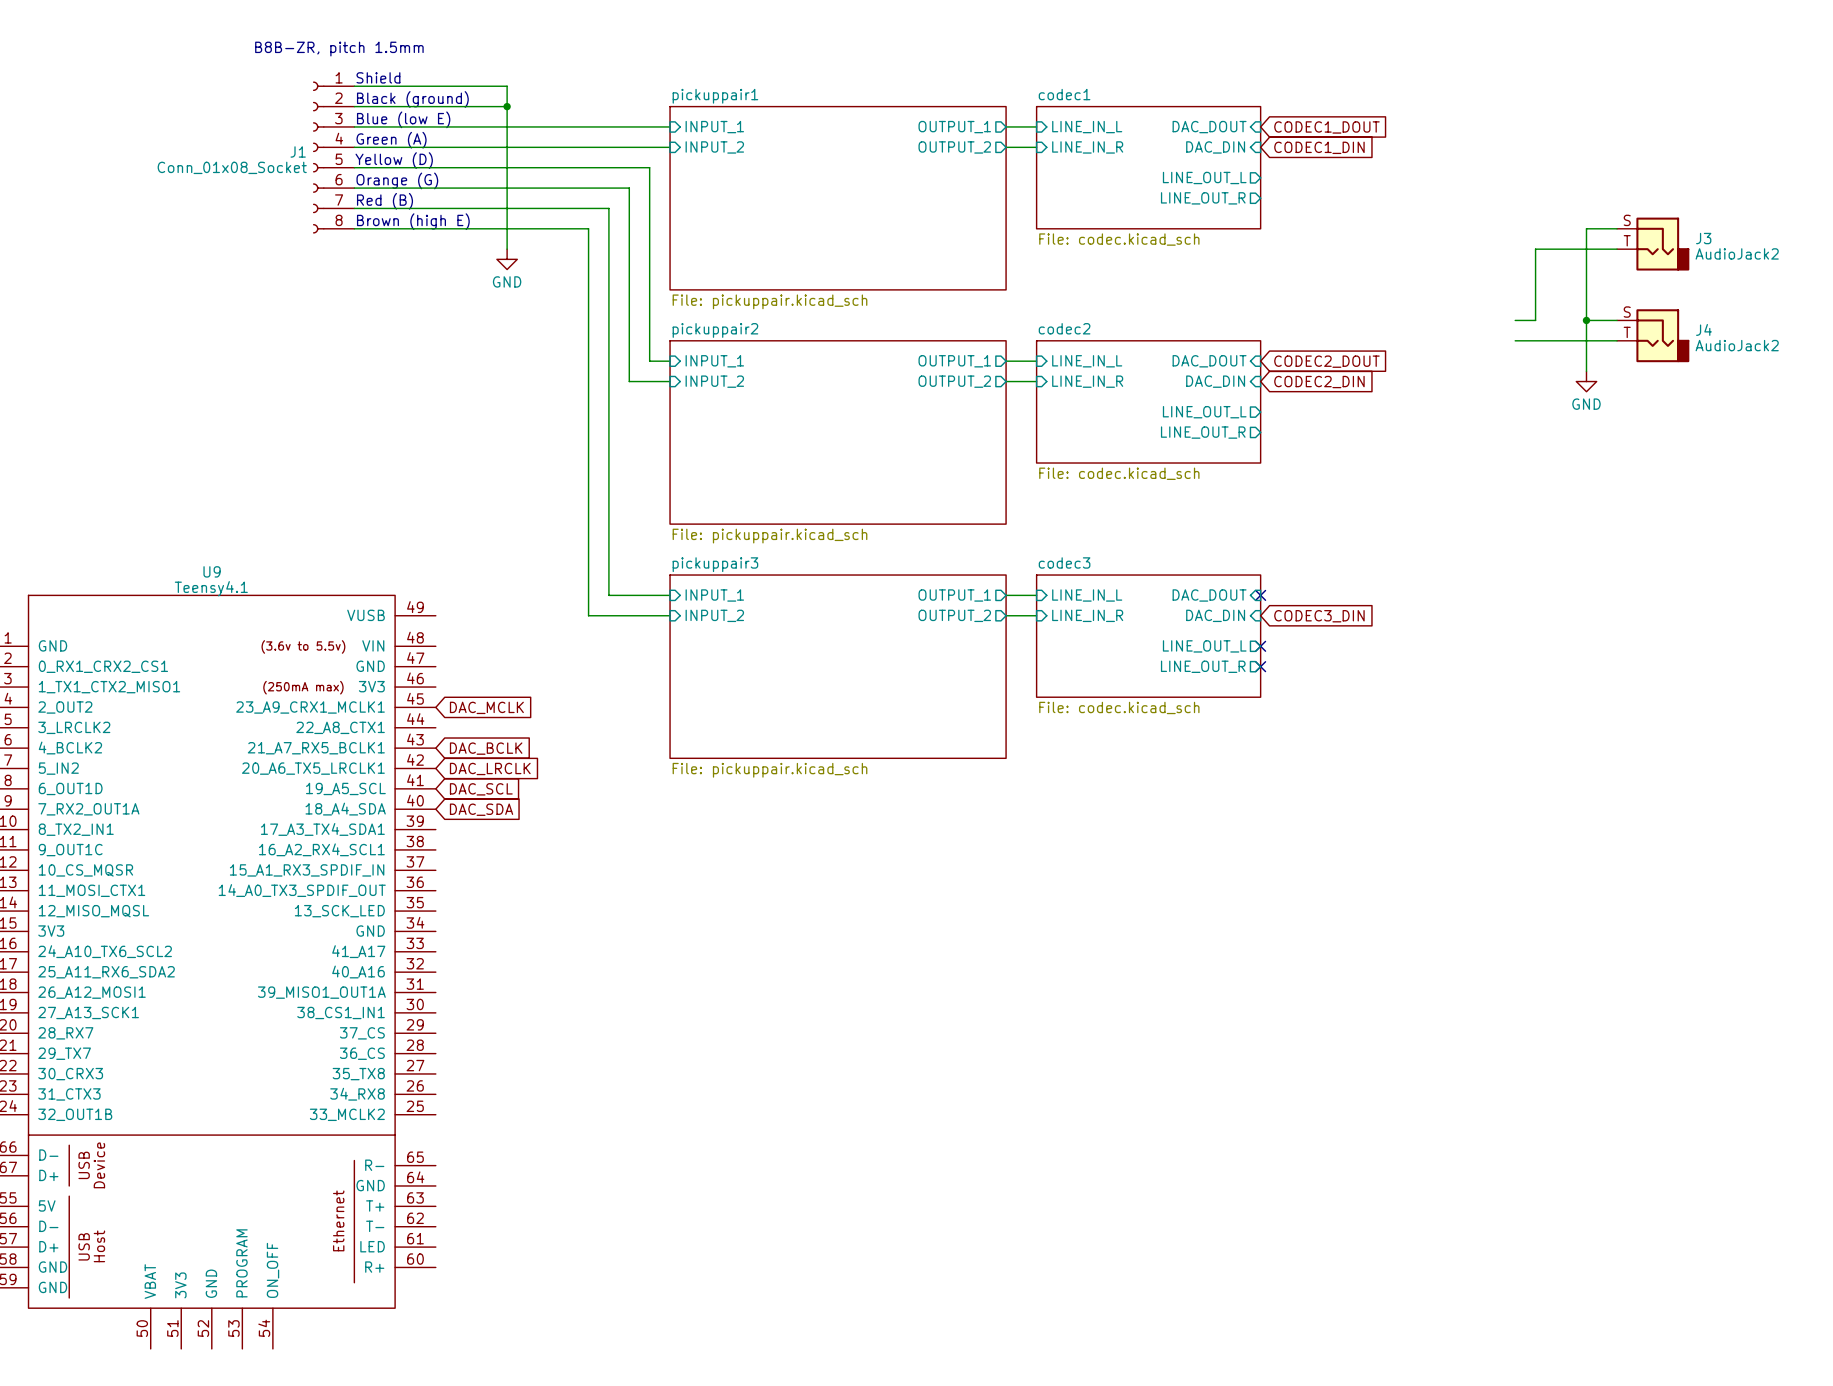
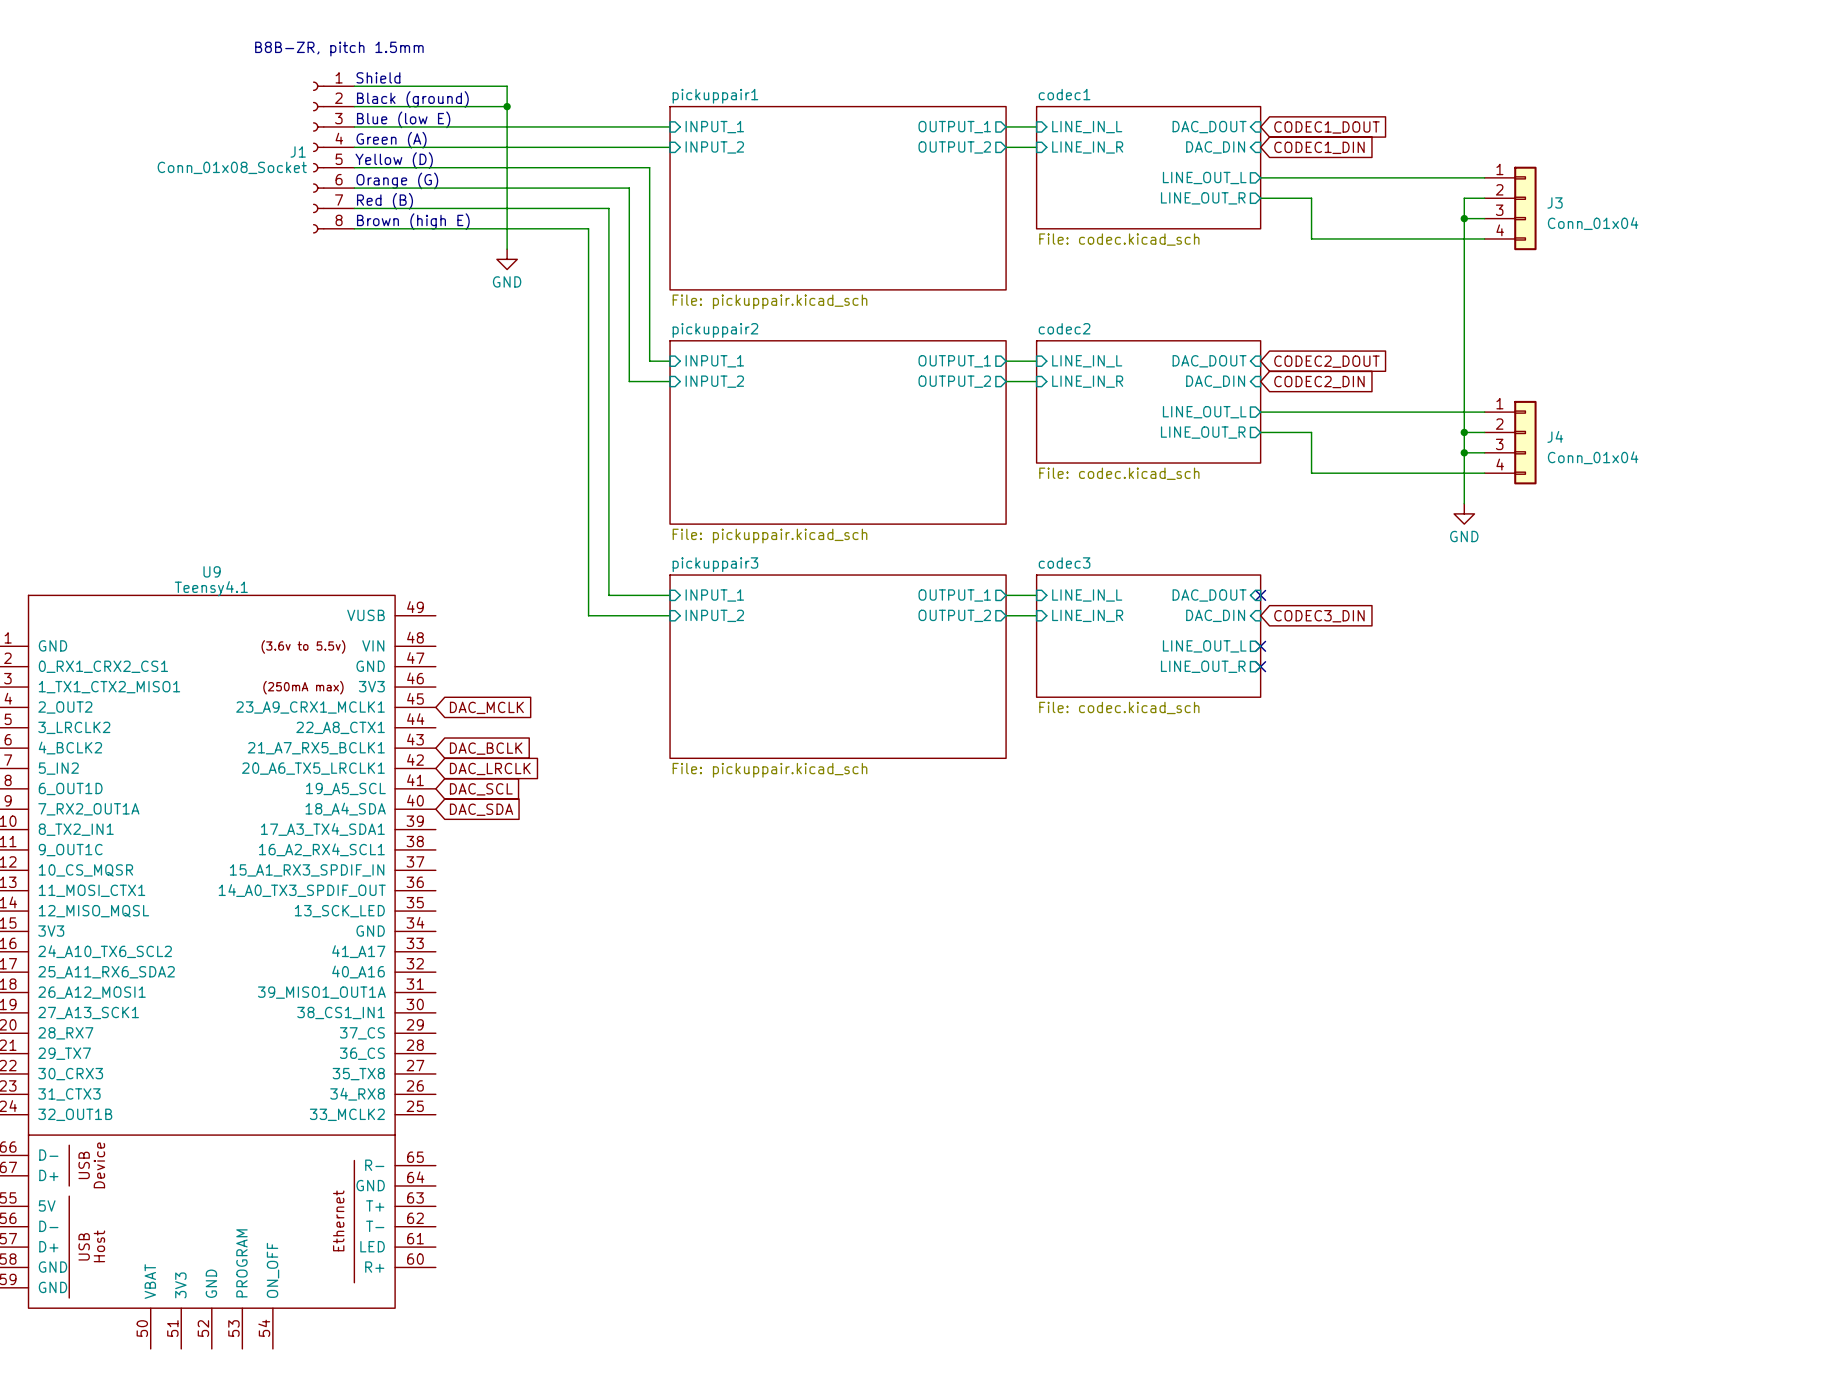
wire: none -> (1260, 177) (1484, 177)
wire: none -> (1260, 198) (1311, 198) (1311, 238) (1484, 238)
wire: none -> (1484, 198) (1464, 198) (1464, 503)
J3 symbol: [1617, 217, 1690, 271] -> [1484, 166, 1537, 251]
wire: none -> (1464, 218) (1484, 218)
junction: none -> (1464, 218)
wire: (1617, 228) (1586, 228) (1586, 371) -> none
wire: (1617, 249) (1535, 249) (1535, 320) (1515, 320) -> none
J3 value: AudioJack2 (1737, 253) -> Conn_01x04 (1593, 223)
J4 symbol: [1617, 309, 1690, 363] -> [1484, 400, 1537, 485]
wire: (1586, 320) (1617, 320) -> none
junction: (1586, 320) -> none
wire: (1515, 340) (1617, 340) -> none
J4 value: AudioJack2 (1737, 345) -> Conn_01x04 (1593, 457)
power symbol position: GND (1586, 381) -> GND (1464, 513)
wire: none -> (1260, 412) (1484, 412)
wire: none -> (1260, 432) (1311, 432) (1311, 473) (1484, 473)
wire: none -> (1464, 432) (1484, 432)
junction: none -> (1464, 432)
wire: none -> (1464, 452) (1484, 452)
junction: none -> (1464, 452)

